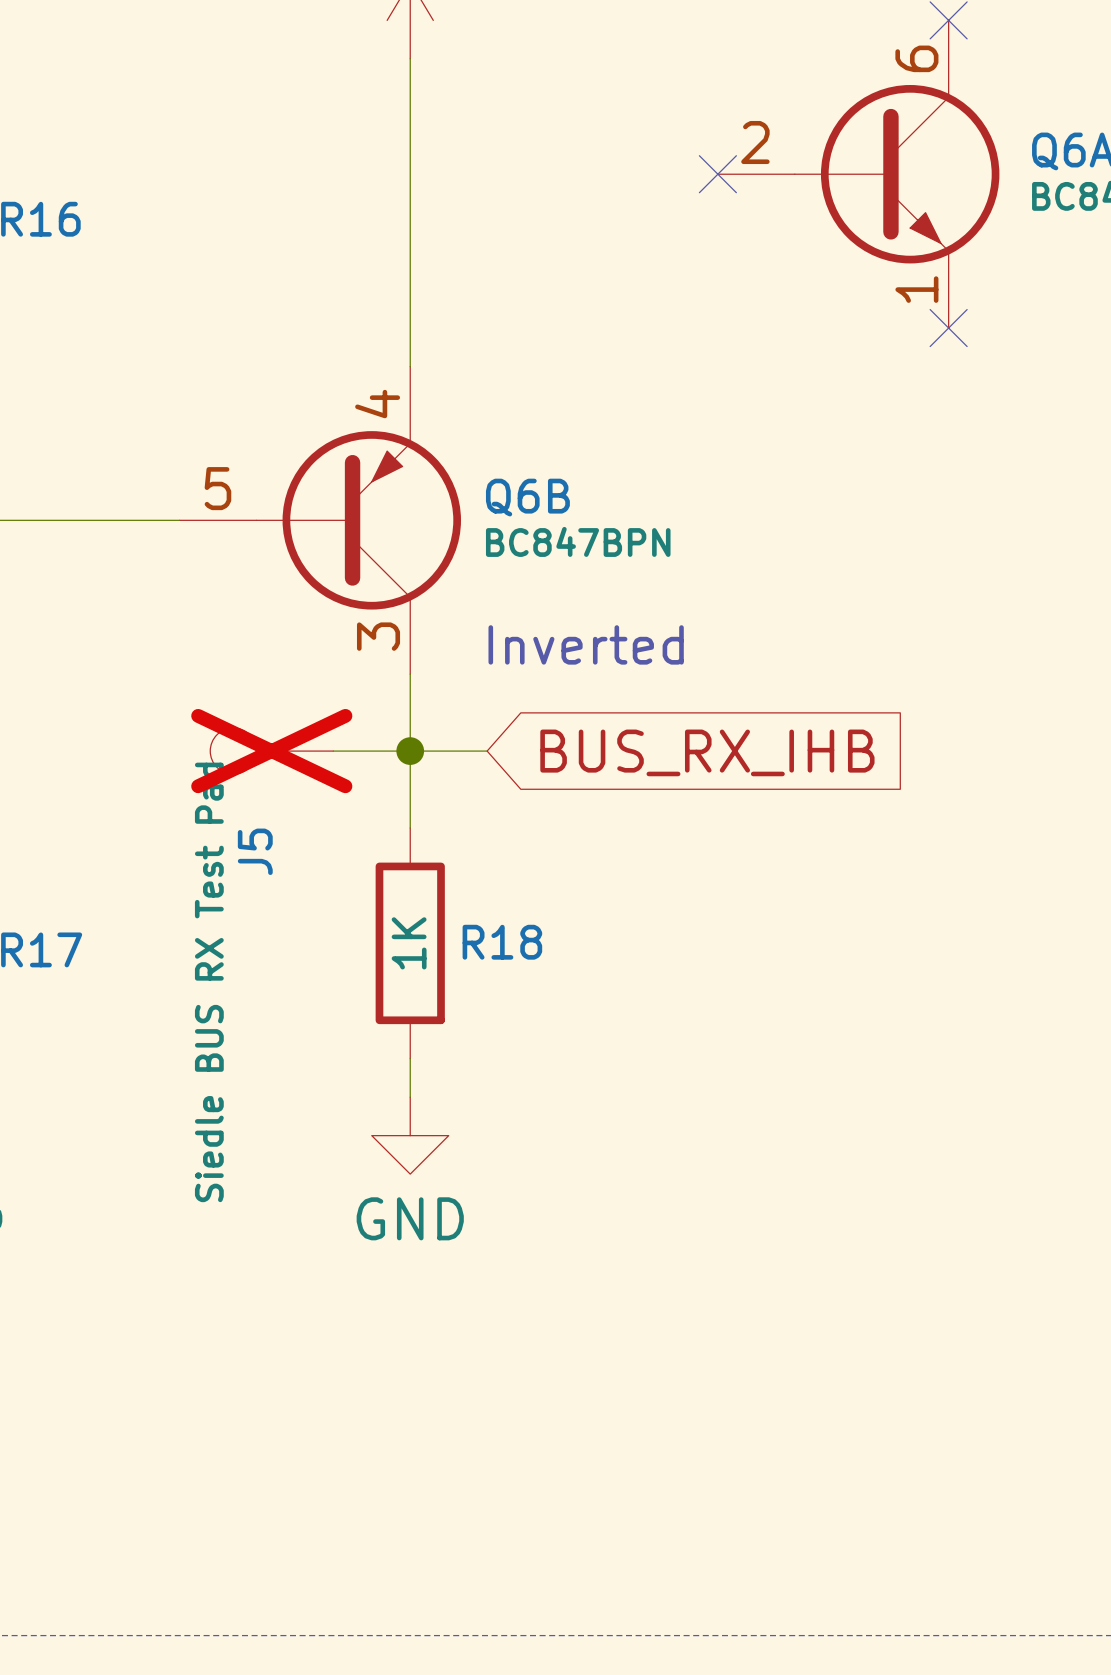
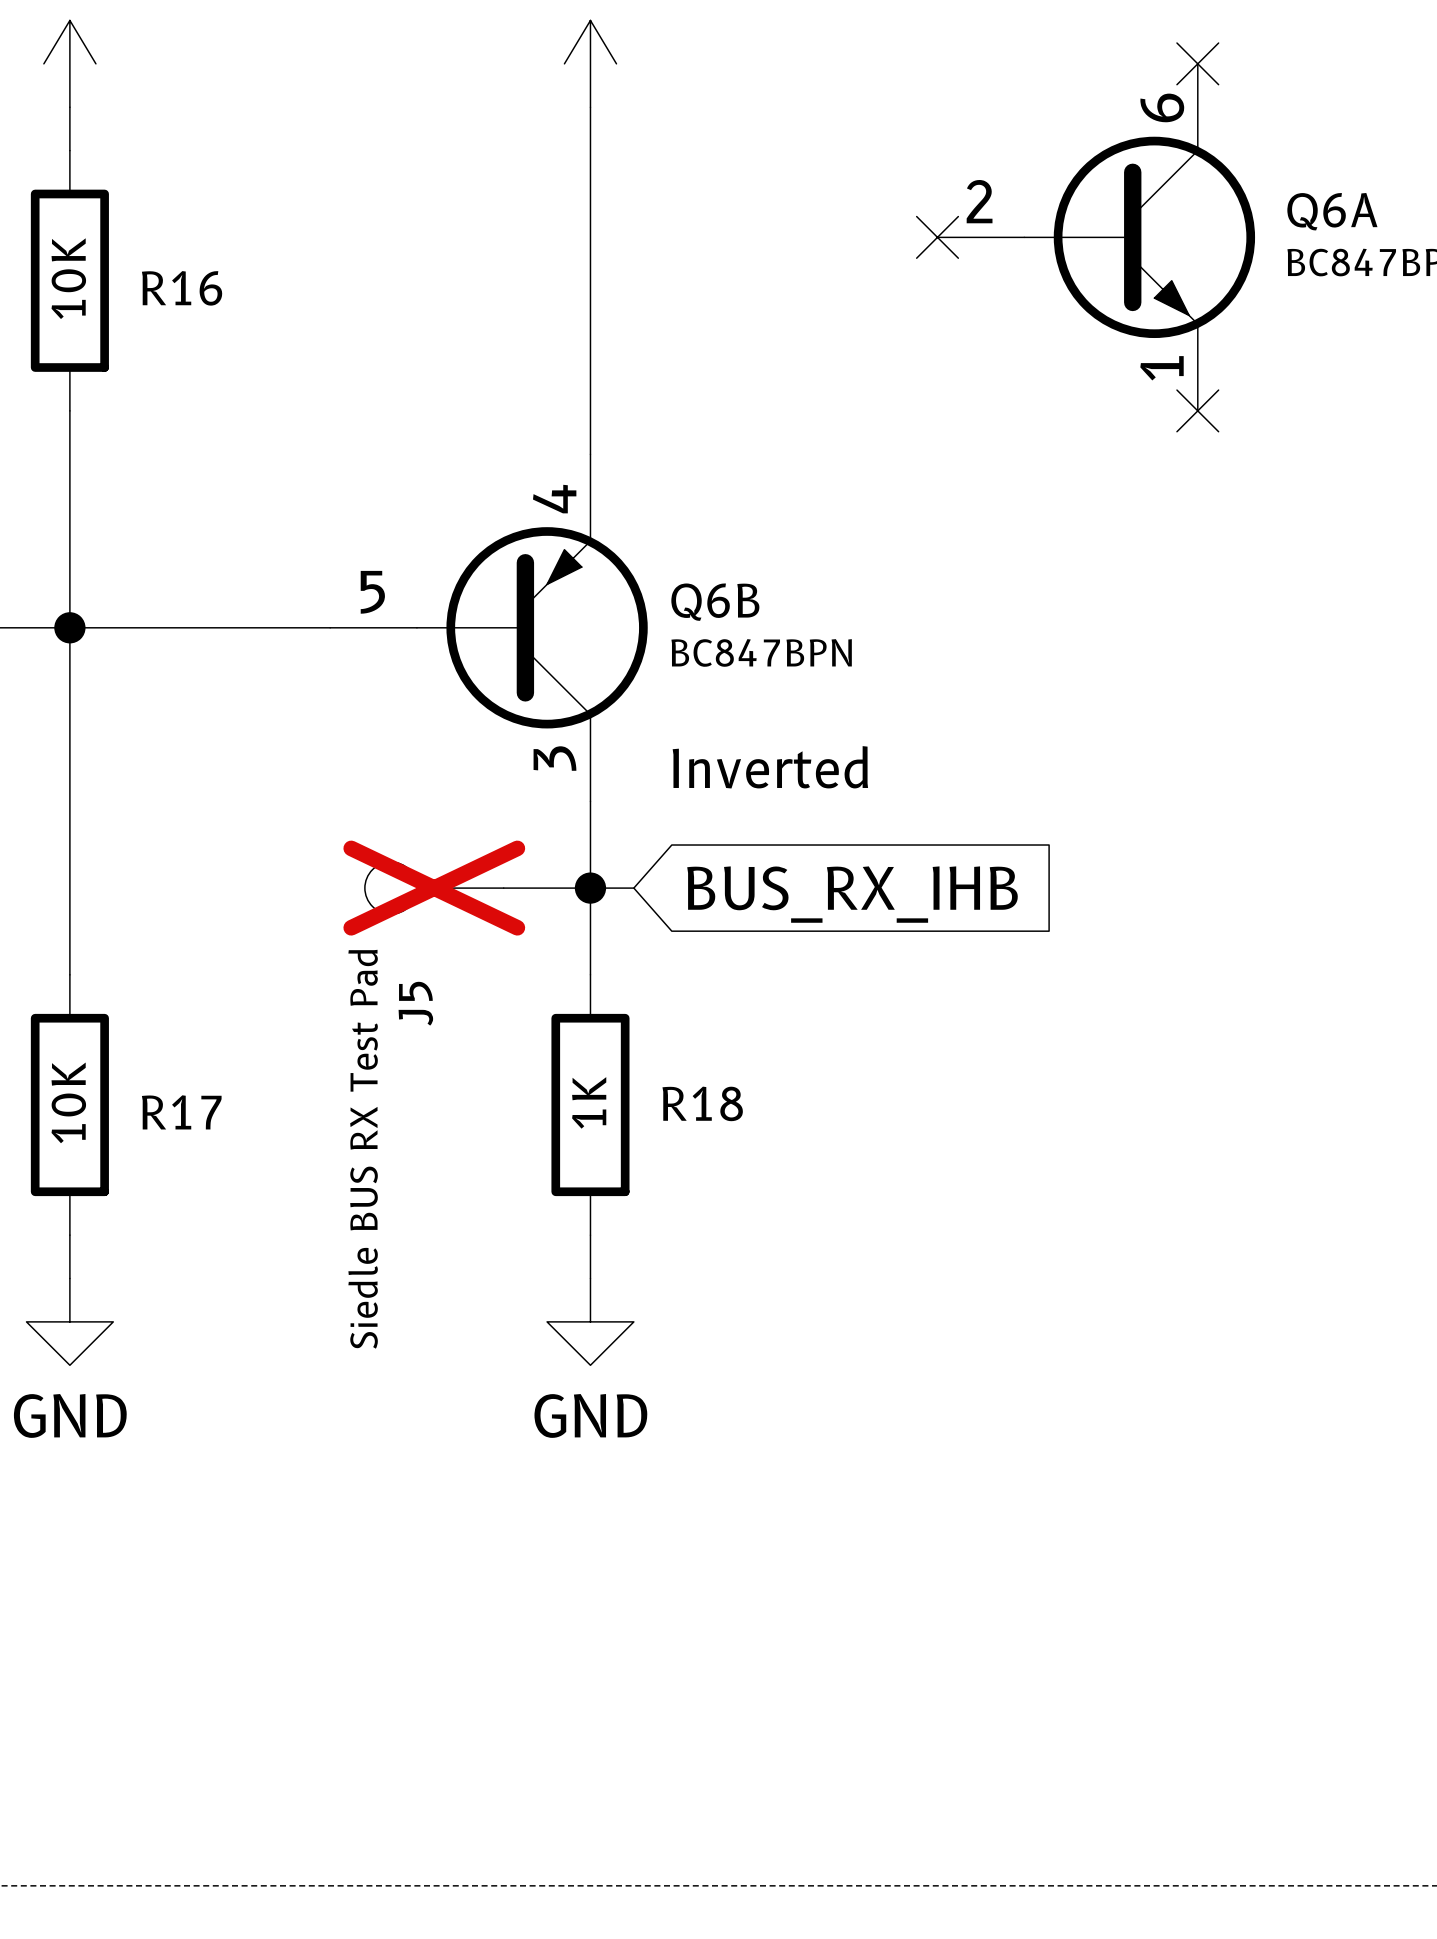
wire: (448, 751) (487, 751) -> none
global label position: BUS_RX_IHB (707, 752) -> BUS_RX_IHB (852, 894)

